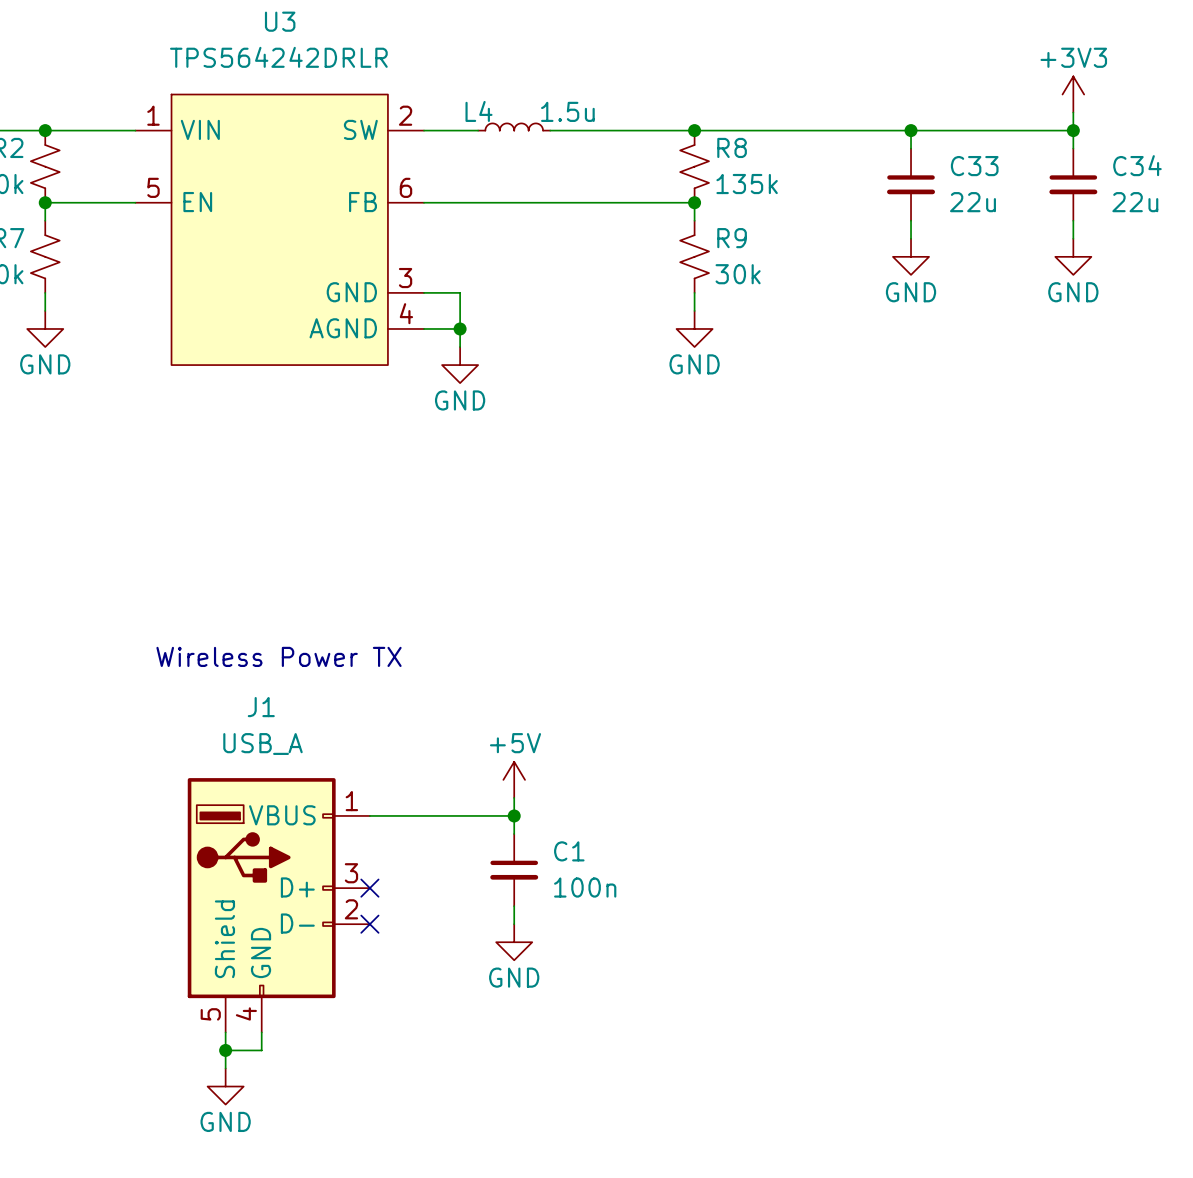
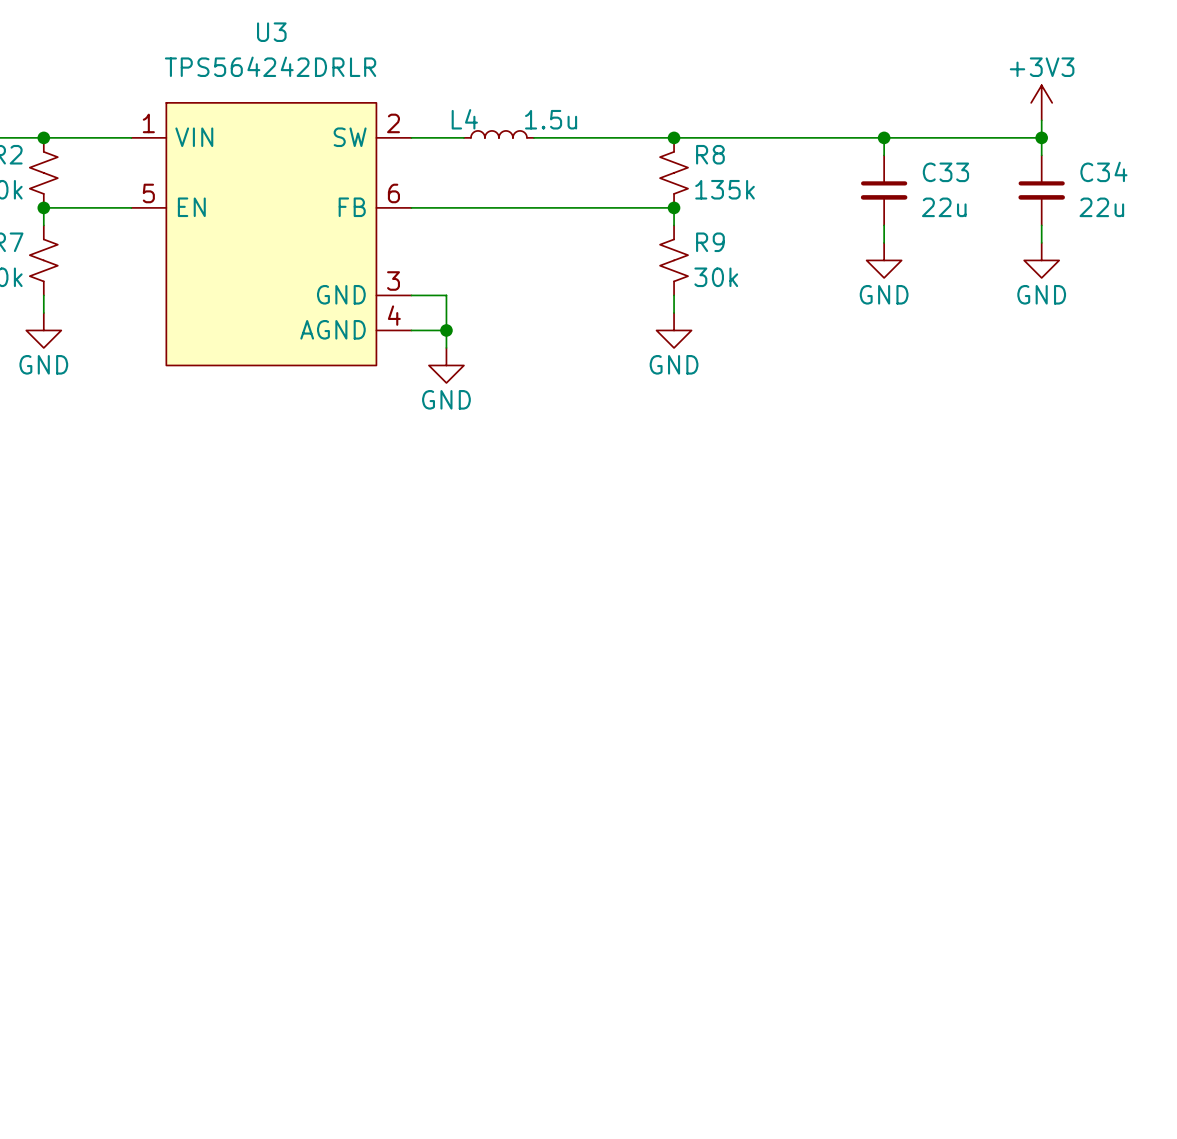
text: Wireless Power TX (279, 656) -> none
power symbol: +5V (514, 779) -> none
wire: (514, 797) (514, 834) -> none
wire: (369, 815) (514, 815) -> none
junction: (514, 815) -> none
C1: 100n (514, 870) -> none
no-connect mark: (369, 888) -> none
J1: USB_A (278, 905) -> none
wire: (514, 906) (514, 924) -> none
no-connect mark: (369, 924) -> none
power symbol: GND (514, 942) -> none
wire: (225, 1032) (225, 1068) -> none
wire: (261, 1032) (261, 1050) (225, 1050) -> none
junction: (225, 1050) -> none
power symbol: GND (225, 1086) -> none

